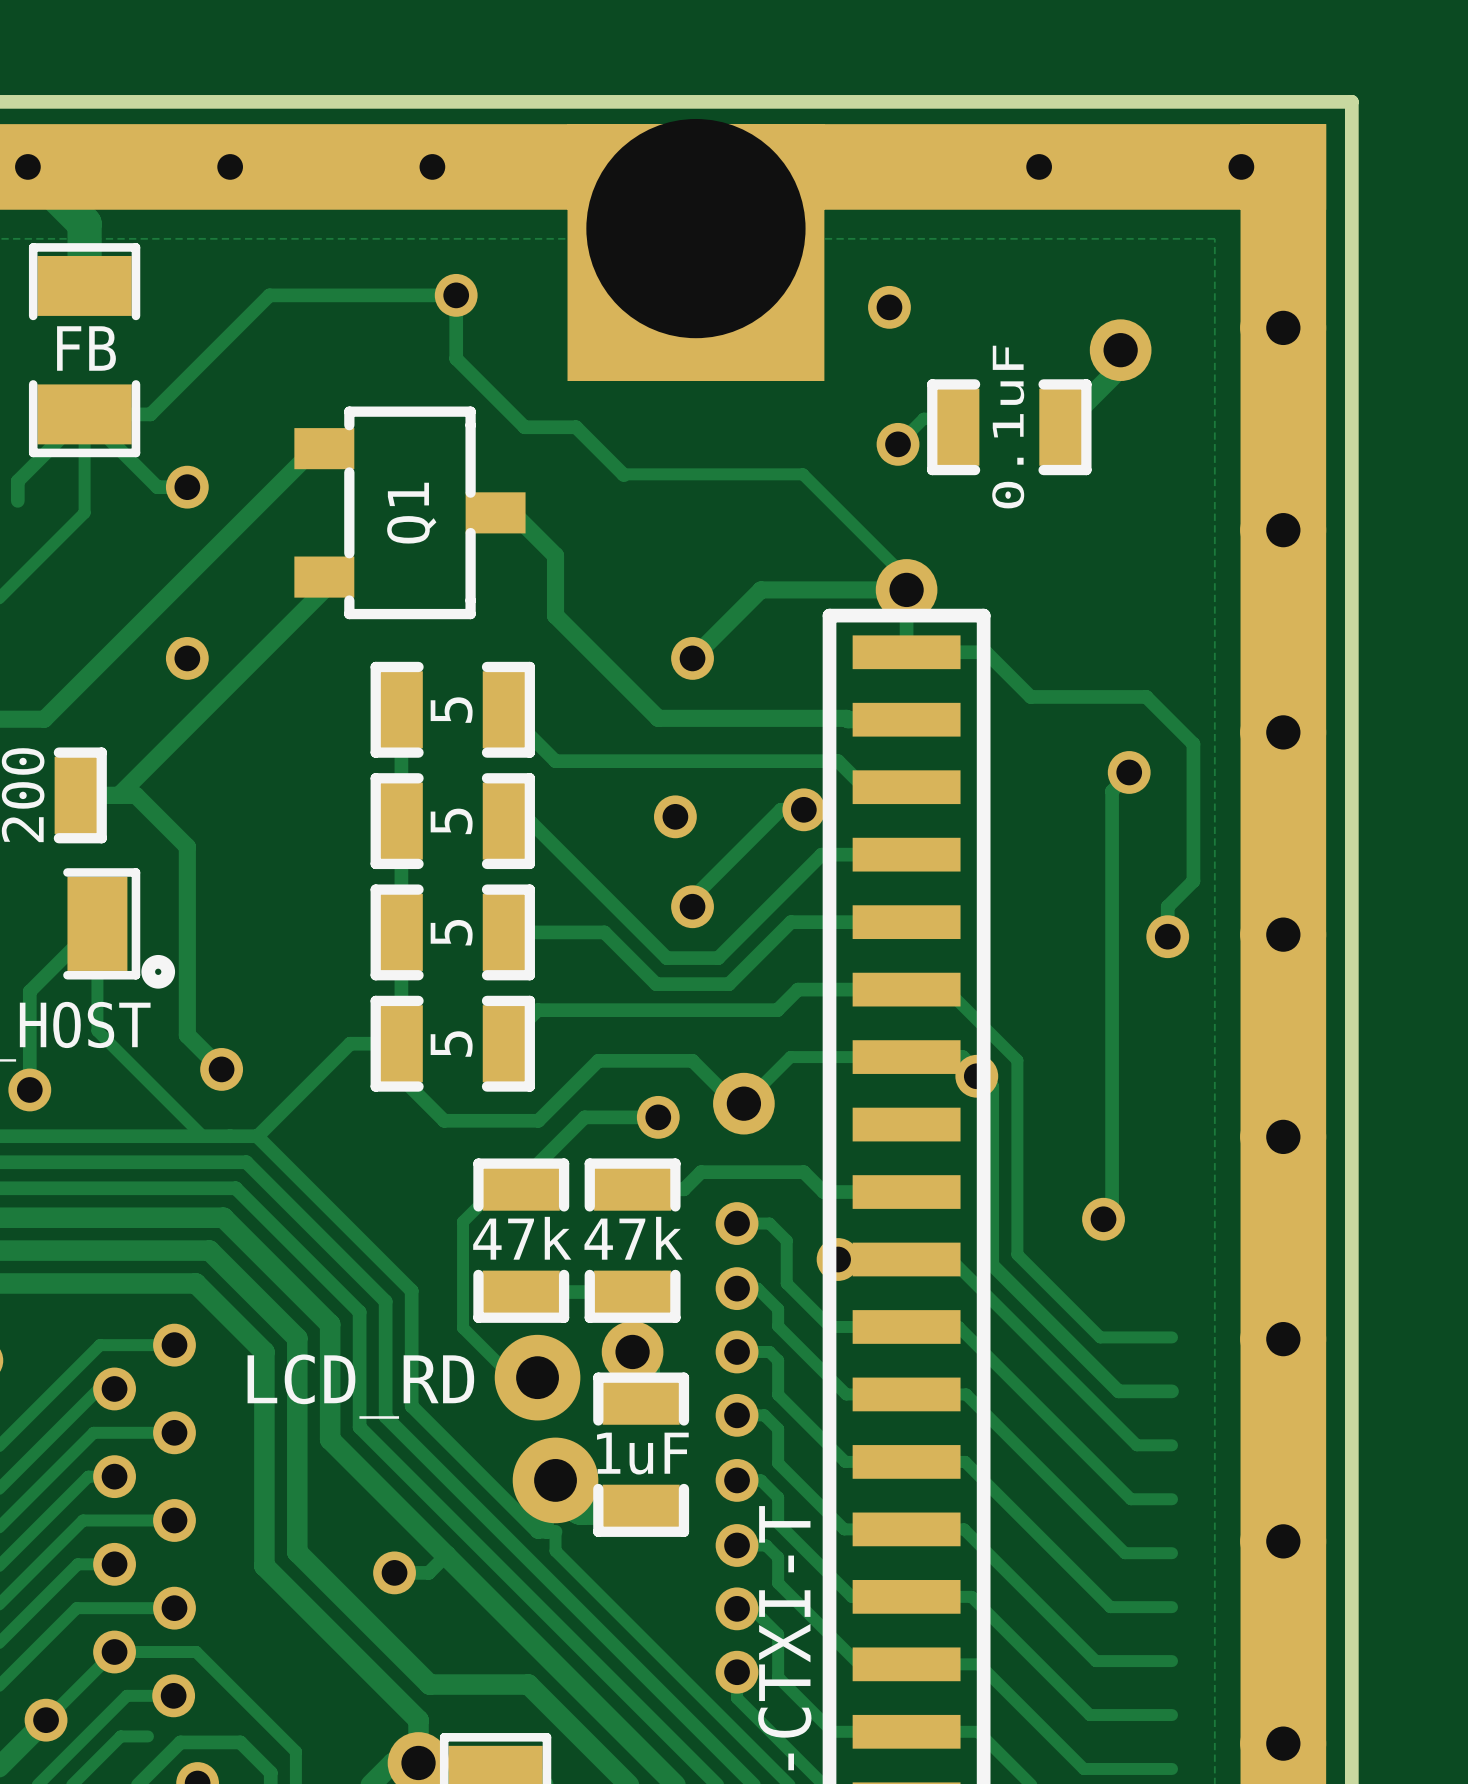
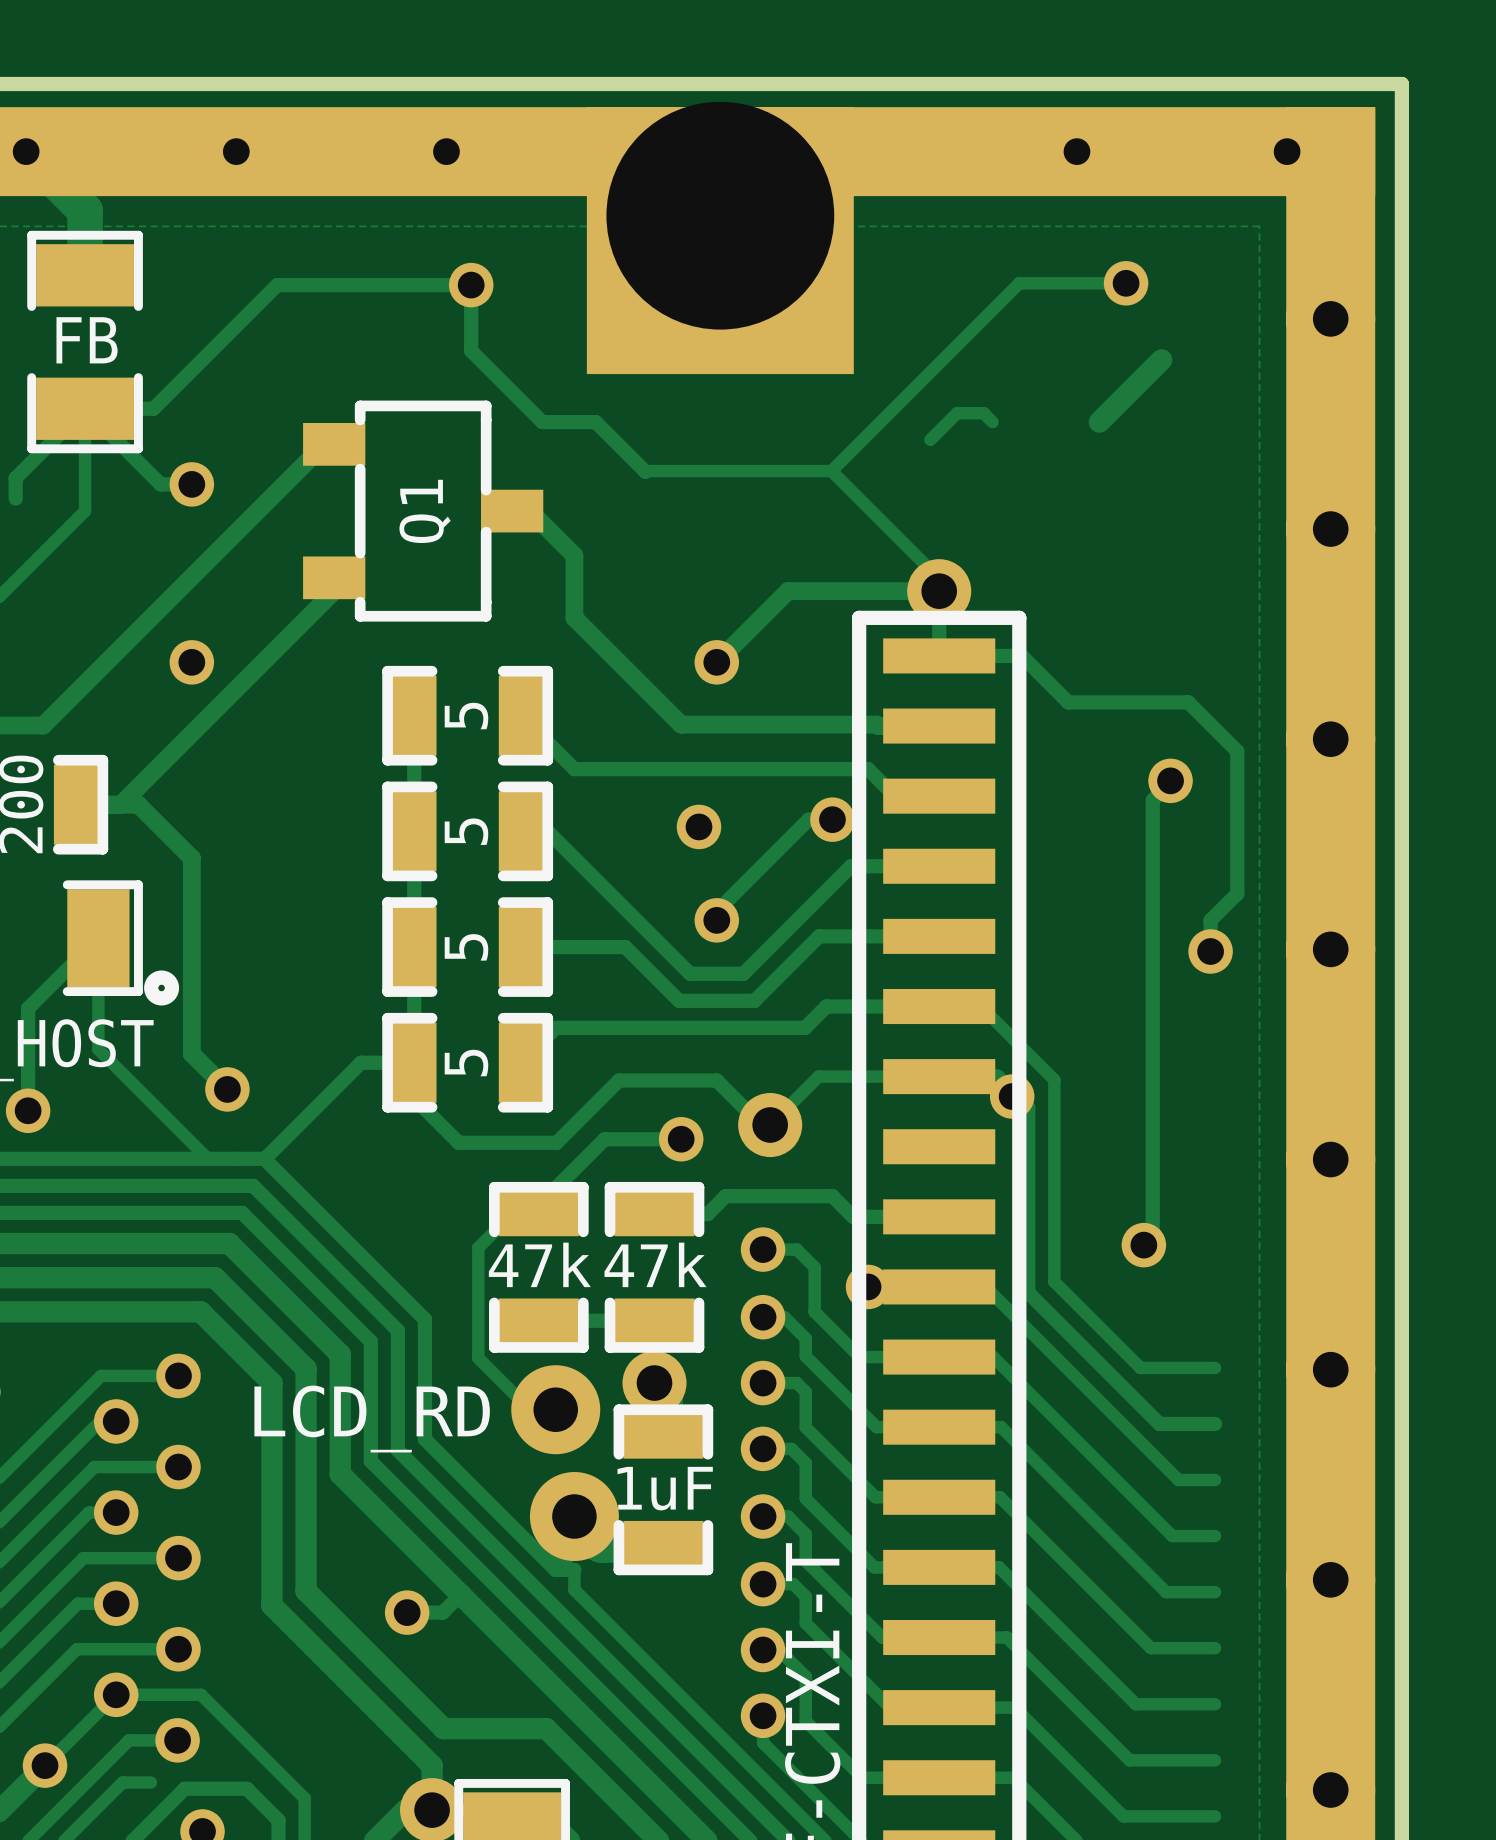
track: none -> (1126, 283) (1019, 283) (831, 471)
part: (889, 307) -> none
part footprint: [1089, 319, 1152, 381] -> [1103, 261, 1149, 306]
part: 0.1uF (1009, 427) -> none
part: (898, 444) -> none

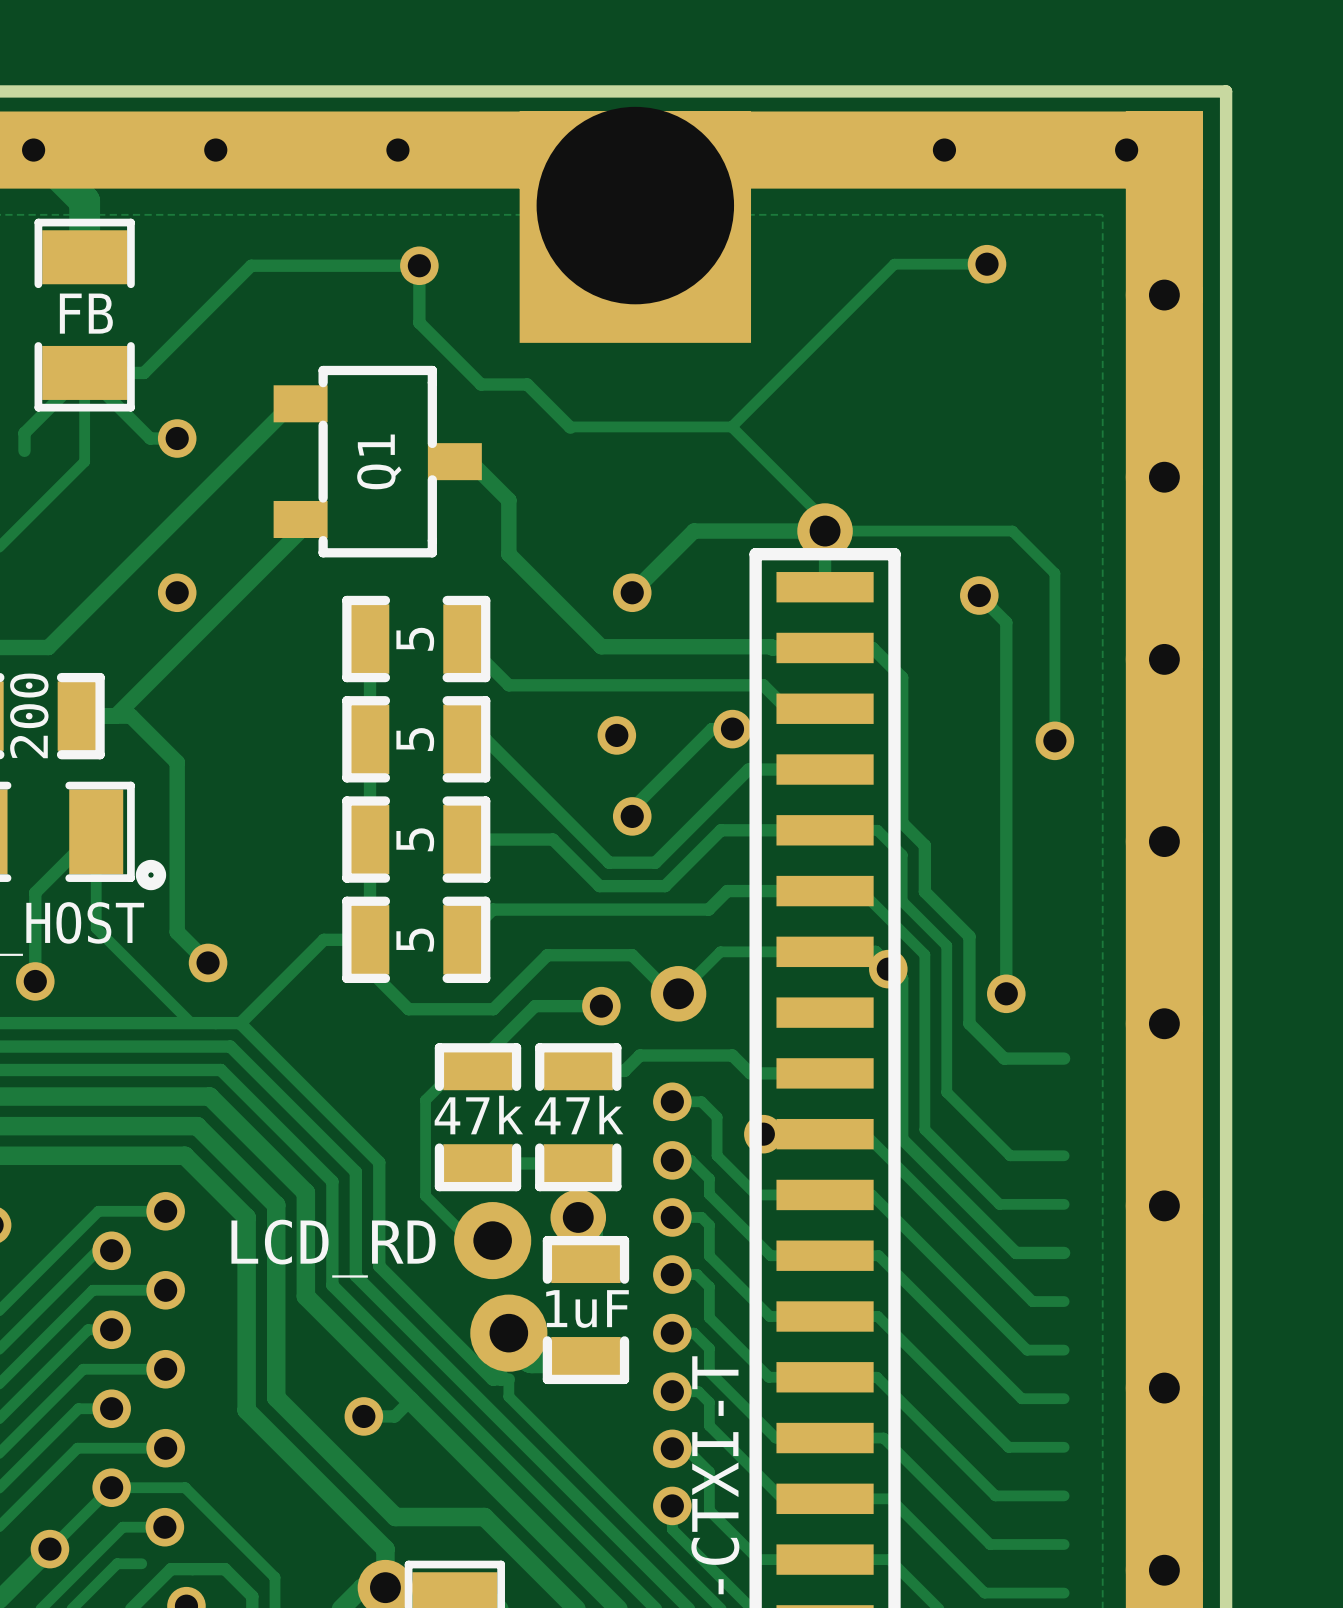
track: (1161, 359) (1099, 422) (1161, 359) -> none
track: (992, 422) (983, 413) (957, 413) (930, 439) -> none
track: none -> (825, 531) (1012, 531) (1054, 573) (1054, 740)
track: (939, 655) (1021, 655) (1068, 702) (1188, 702) (1237, 751) (1237, 893) (1210, 920) (1210, 951) -> none
track: none -> (979, 595) (1006, 622) (1006, 993)
part: none -> (979, 595)
track: none -> (825, 647) (872, 647) (902, 677) (902, 822) (924, 845) (924, 891) (969, 936) (969, 1023) (1004, 1058) (1064, 1058)
track: (1170, 780) (1152, 800) (1152, 1236) (1143, 1245) -> none
part: (1170, 780) -> none
part: none -> (1054, 740)
track: none -> (825, 830) (877, 830) (902, 854) (902, 901) (946, 945) (946, 1092) (1010, 1155) (1064, 1155)
part: (1210, 951) -> none
part: none -> (1006, 993)
part: (1143, 1245) -> none

